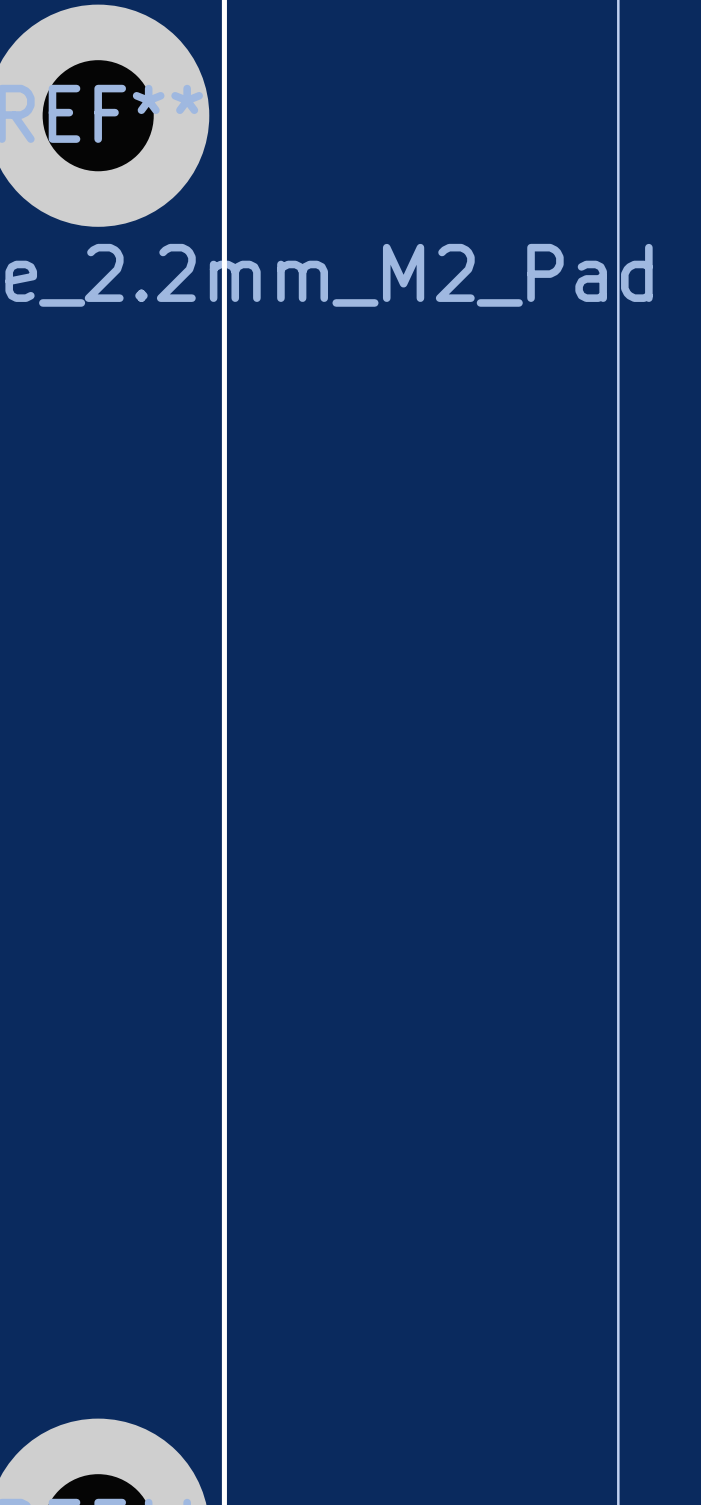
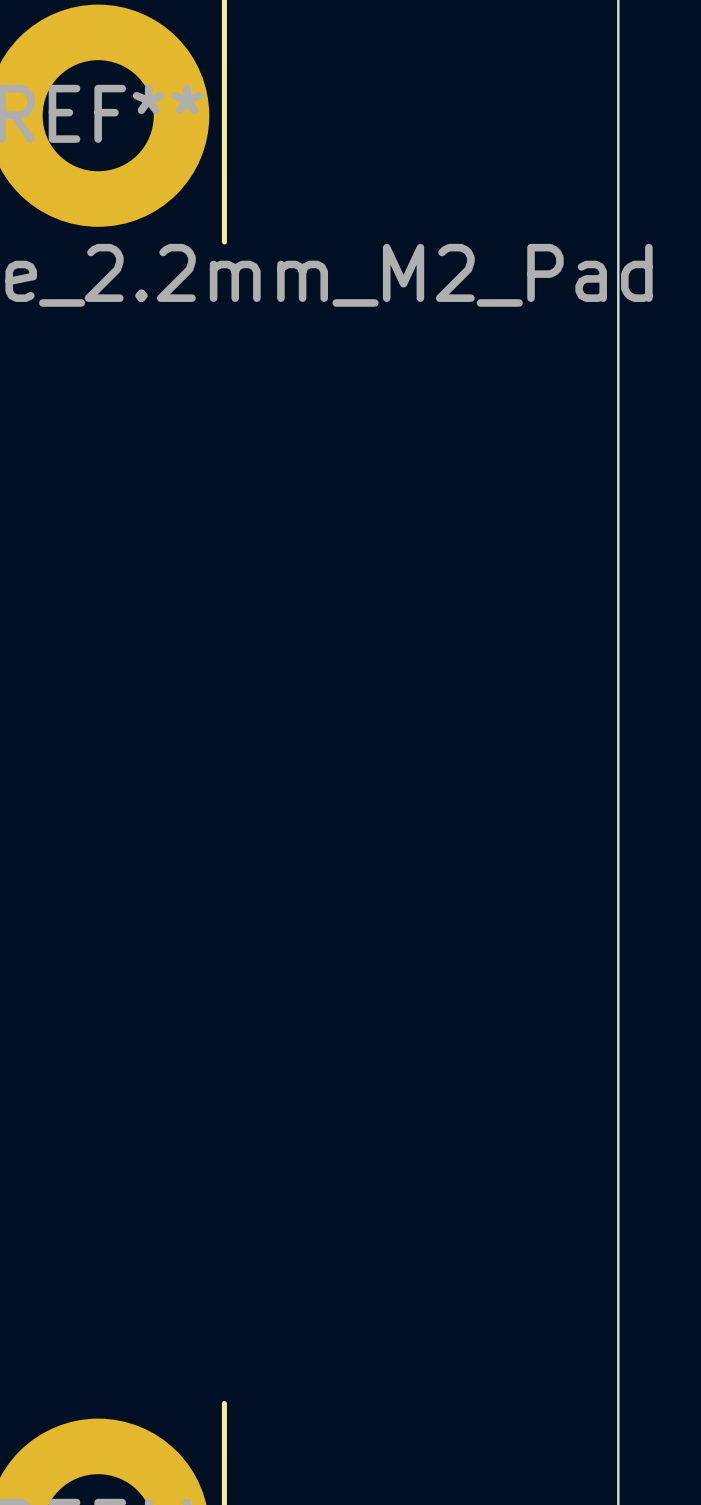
line: (224, 241) (224, 1403) -> none

